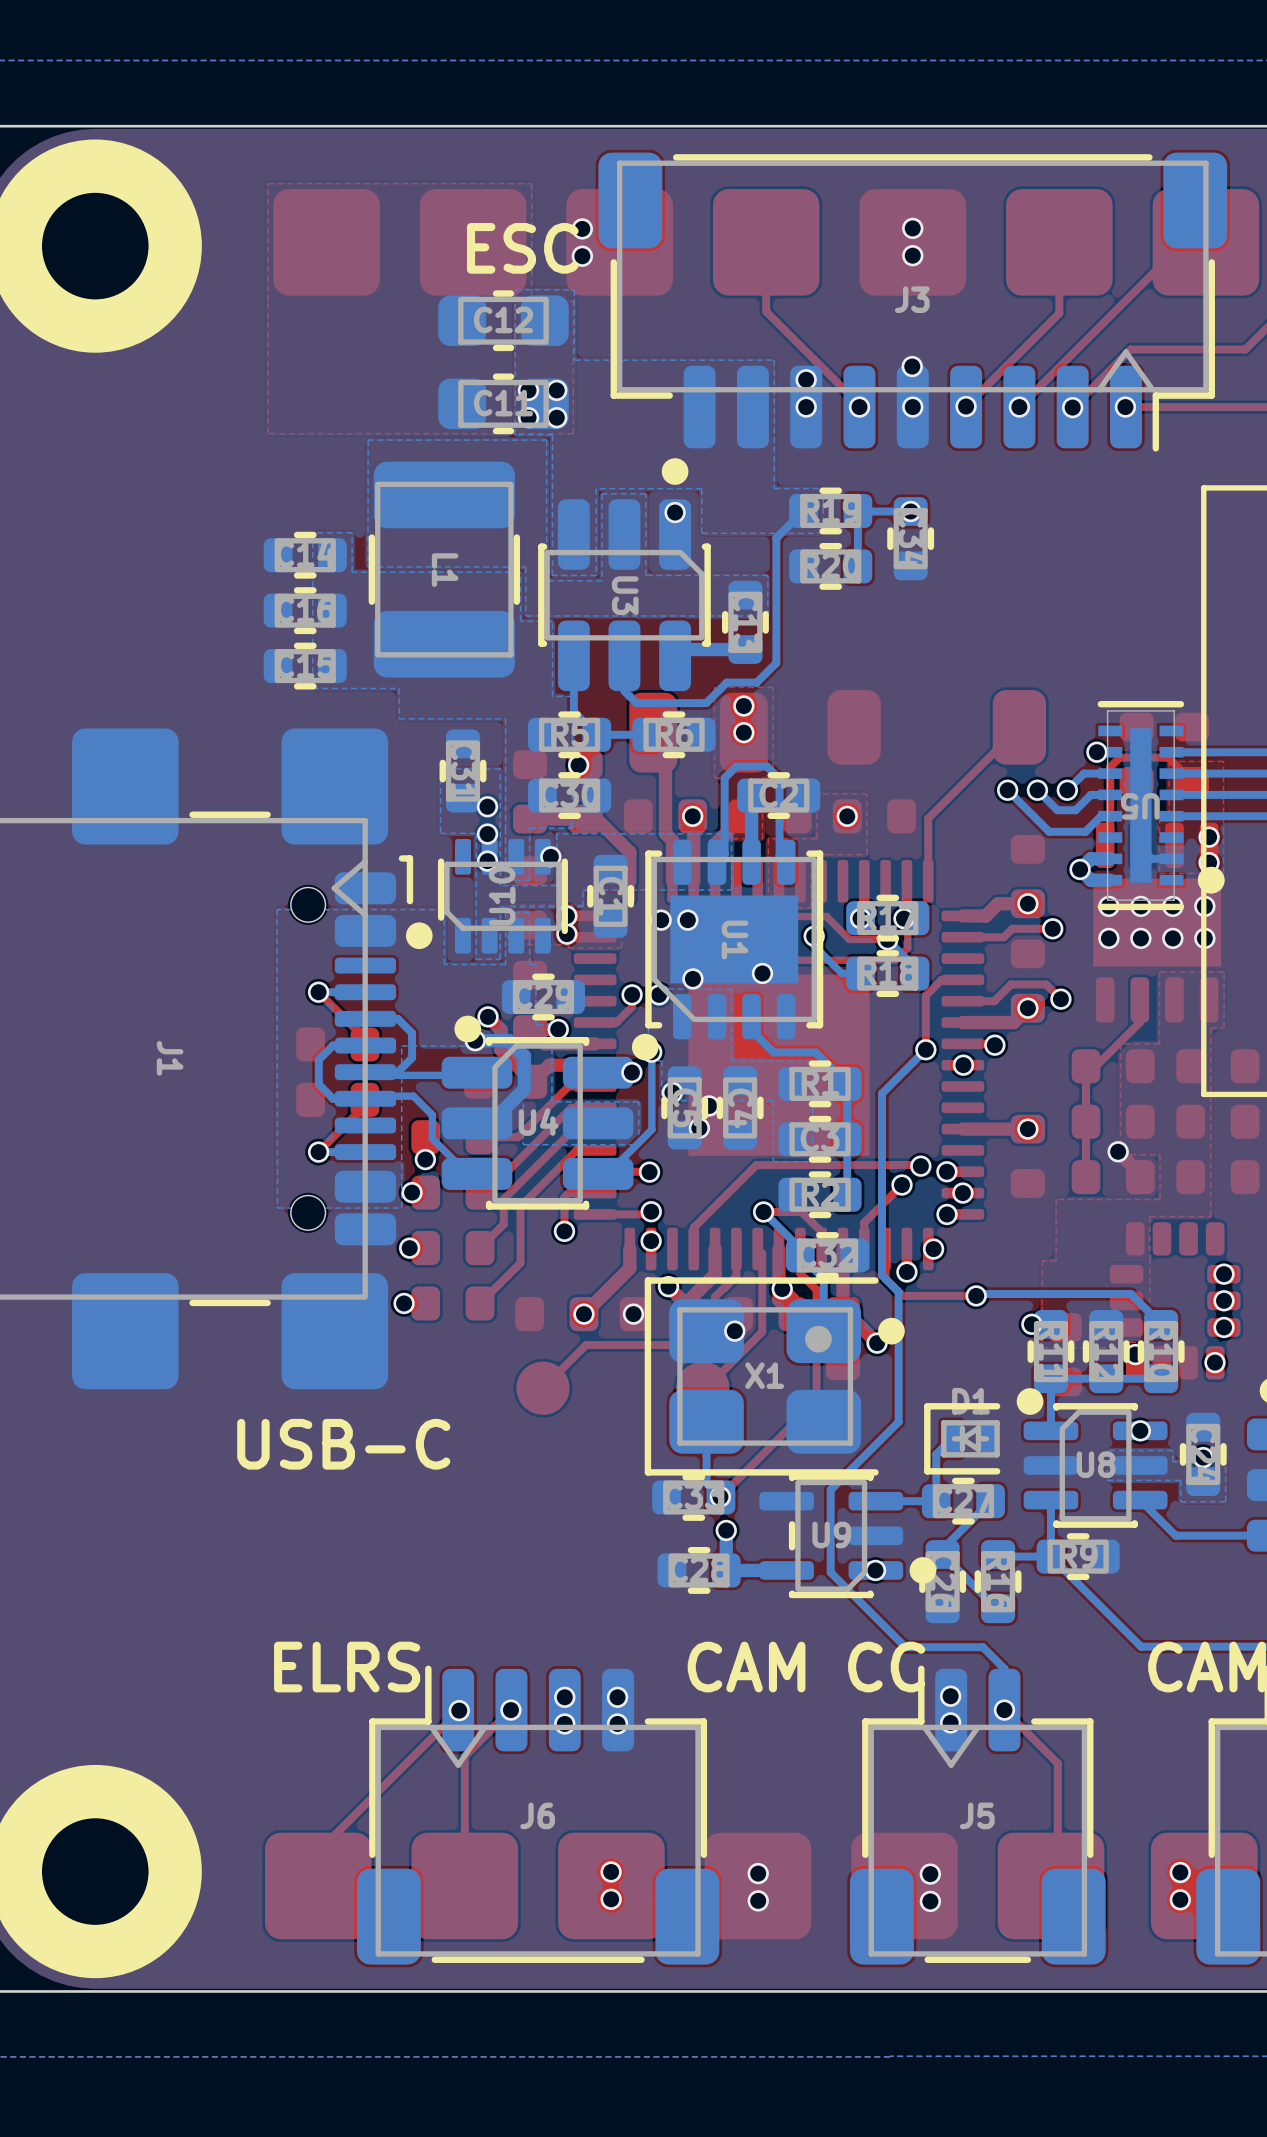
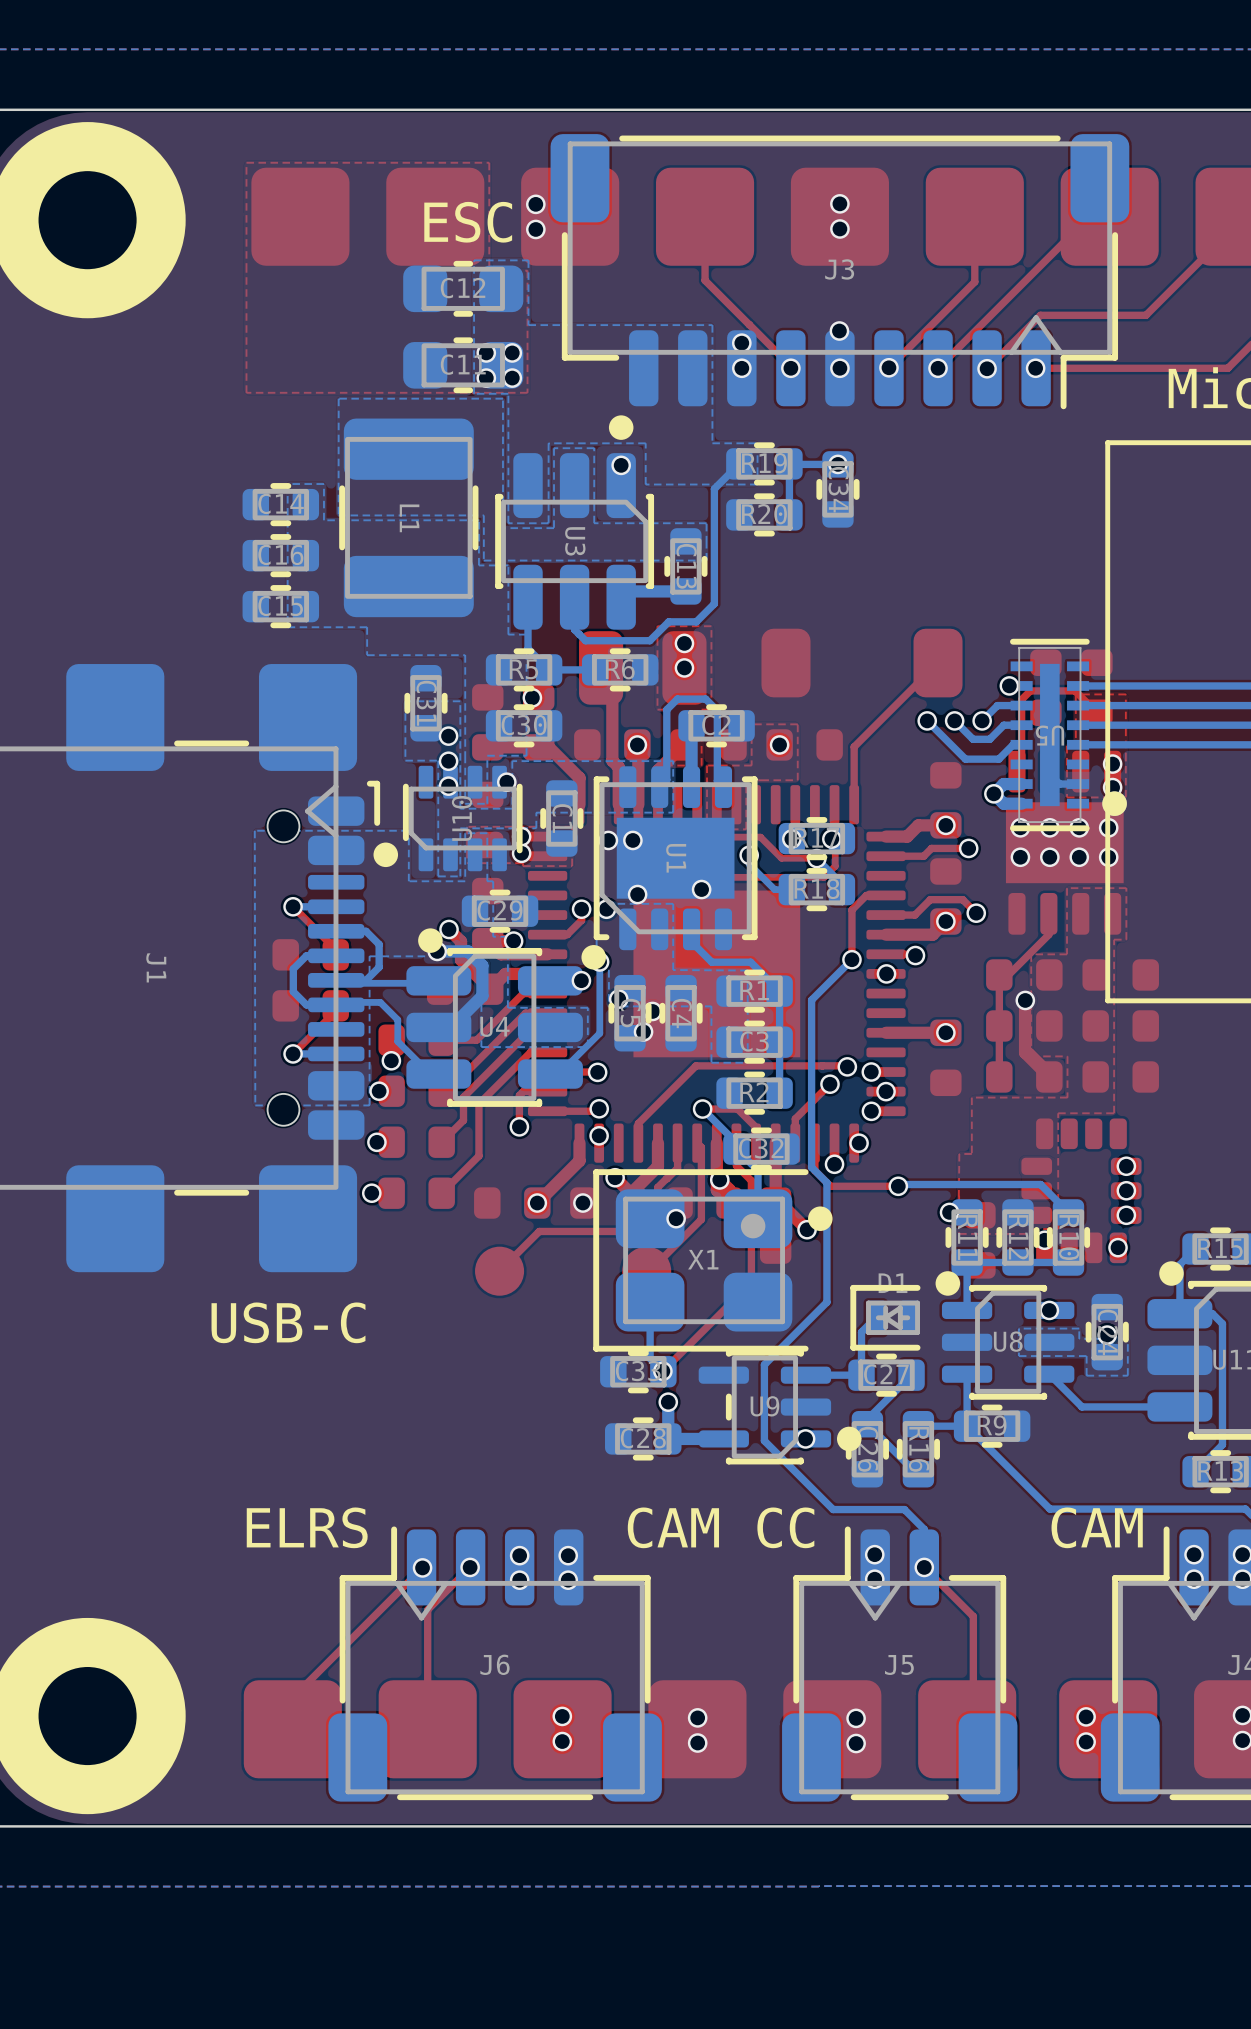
top track: none -> (1025, 1000) (1025, 1052) (1049, 1076)
via position: (1118, 1151) -> (1025, 1000)

